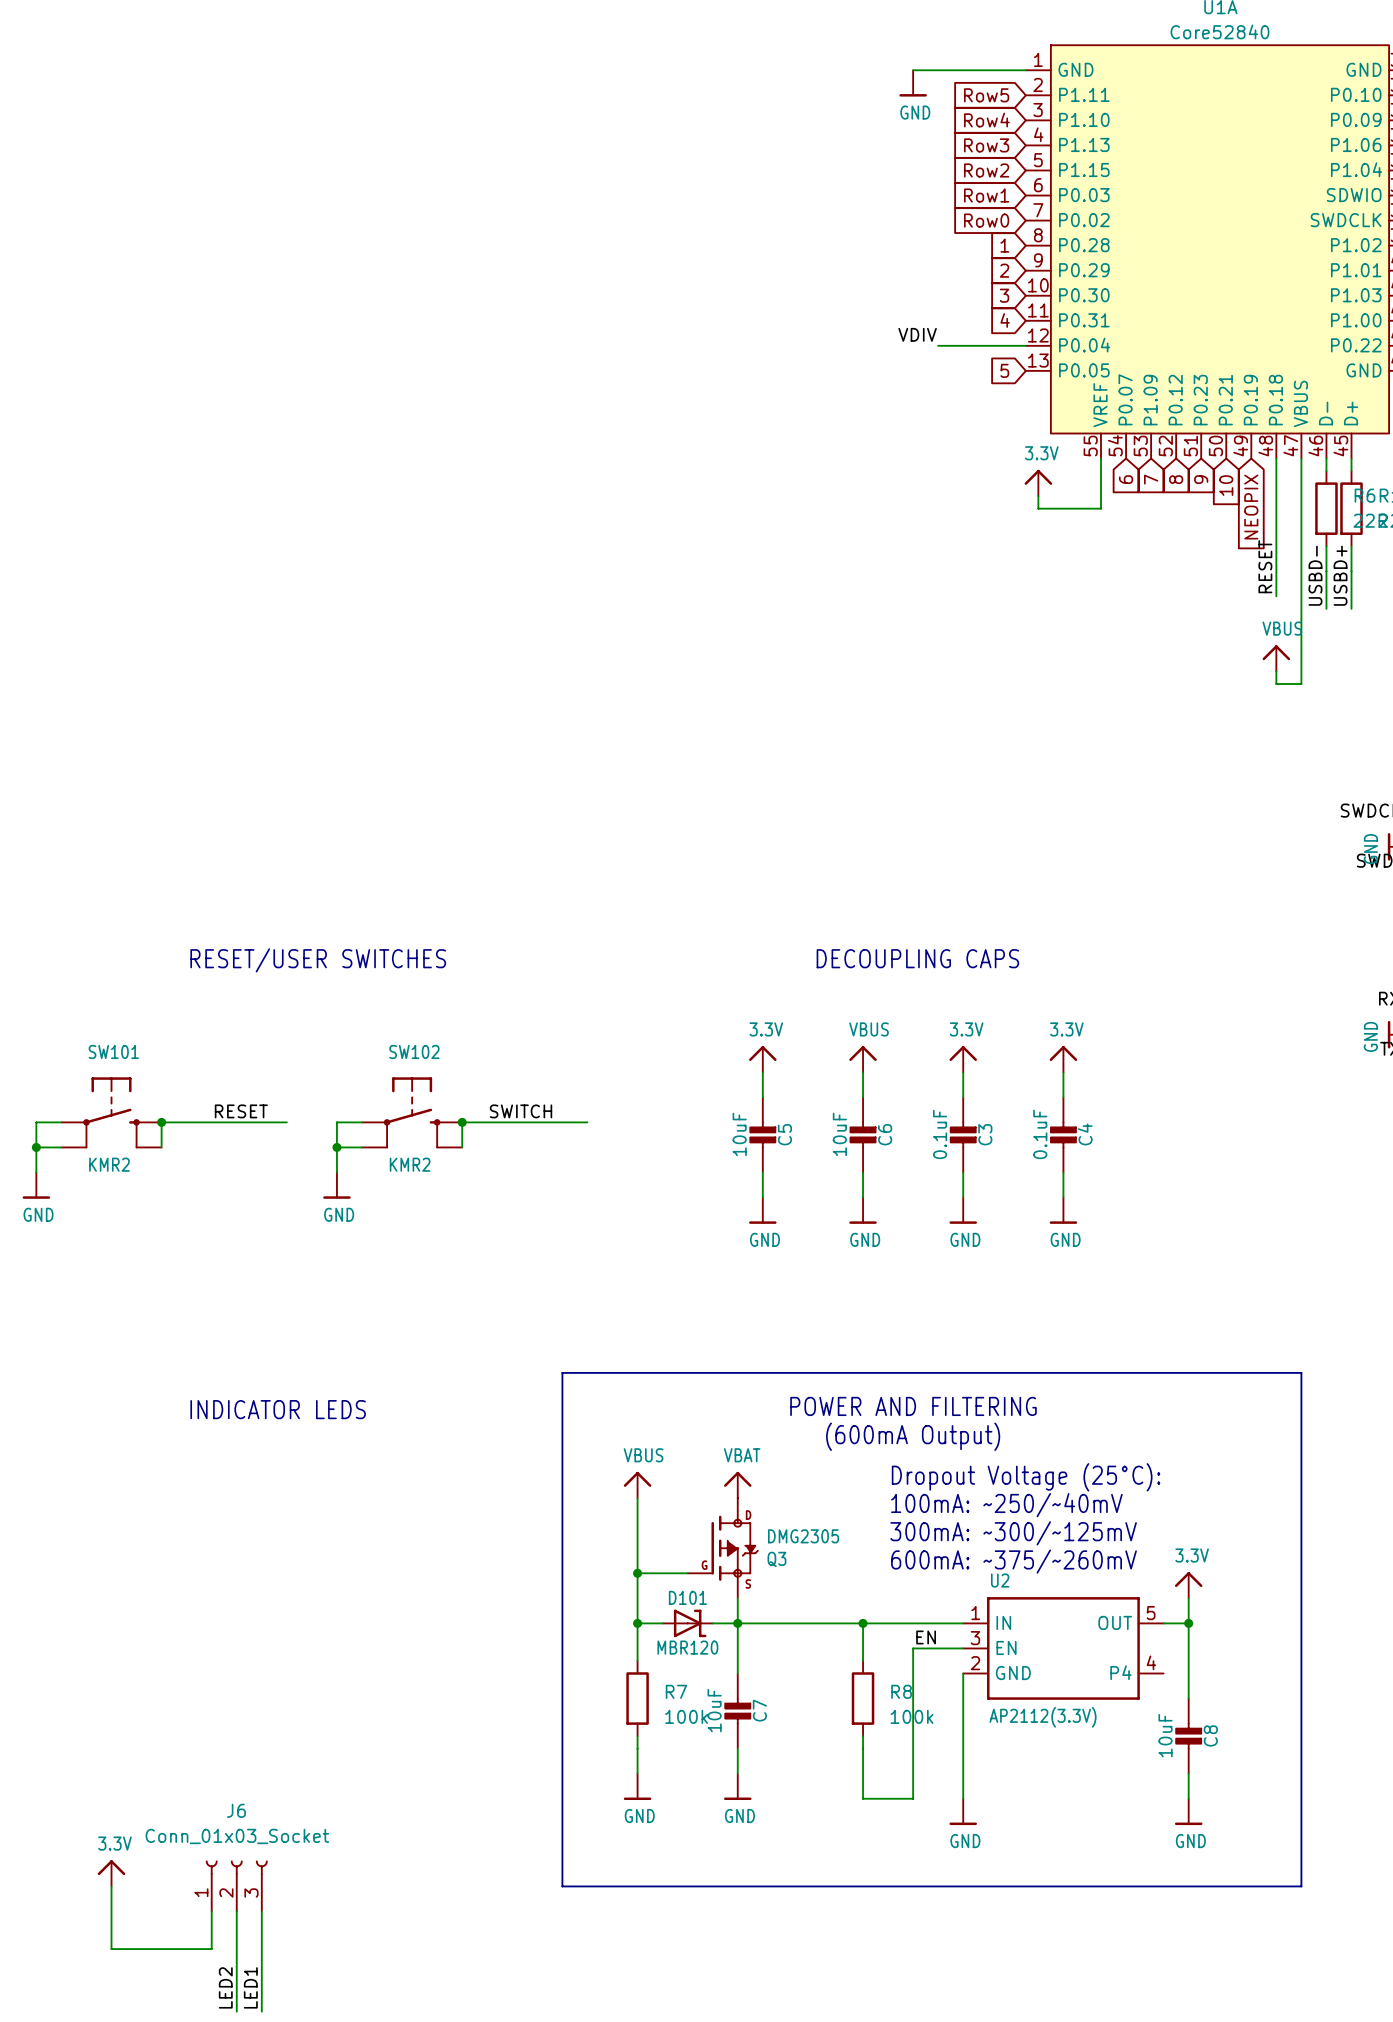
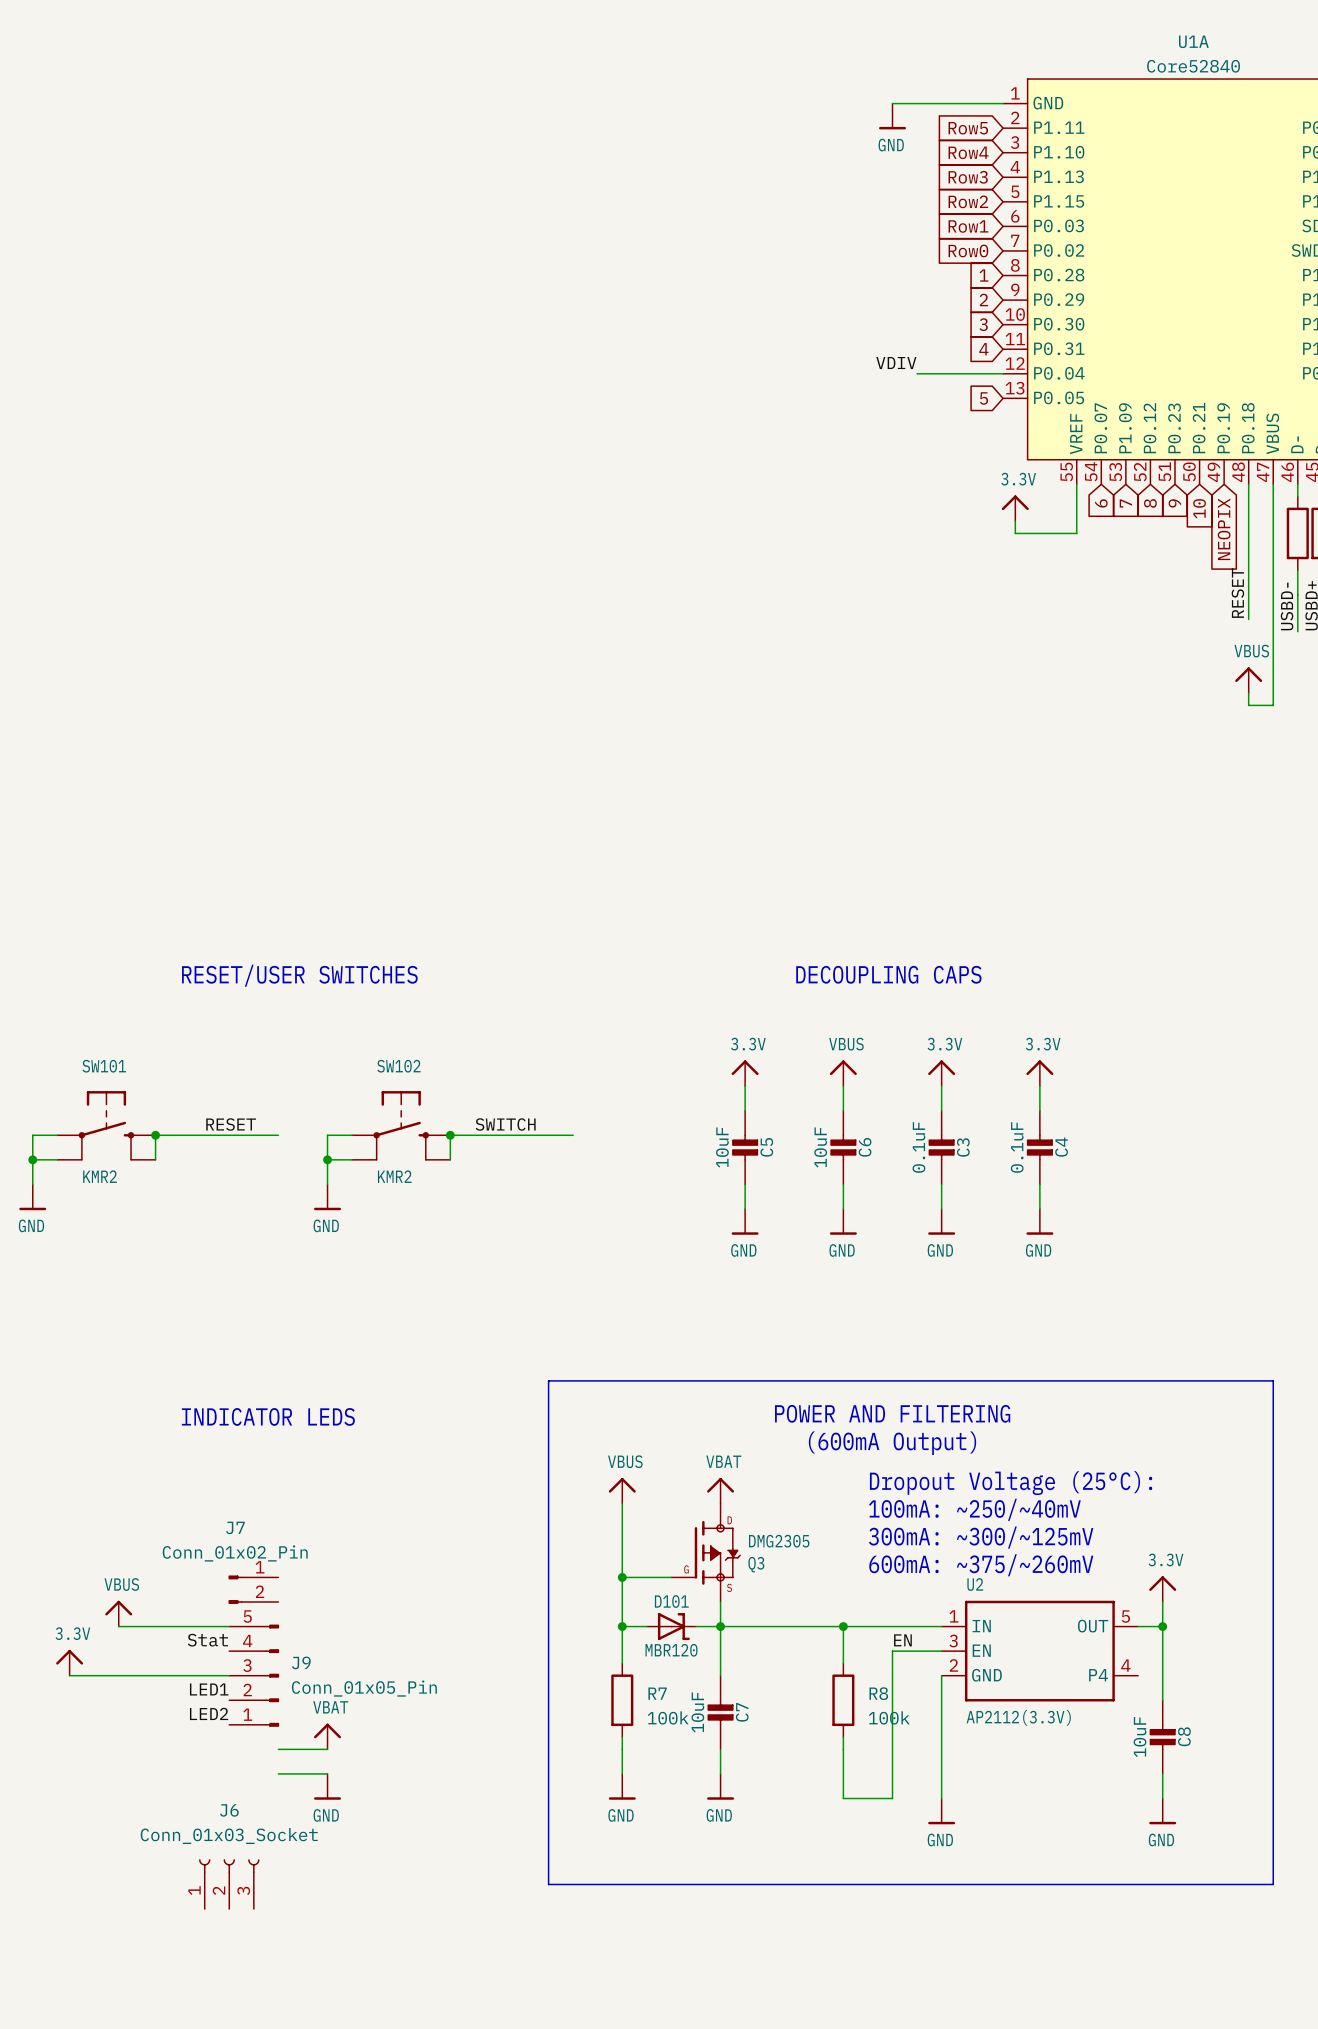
J7: none -> Conn_01x02_Pin (253, 1589)
power symbol: none -> VBUS (118, 1613)
wire: none -> (118, 1626) (229, 1626)
label: none -> Stat (207, 1640)
wire: none -> (69, 1675) (229, 1675)
J9: none -> Conn_01x05_Pin (254, 1675)
label: none -> LED1 (209, 1689)
label: none -> LED2 (209, 1713)
power symbol: none -> VBAT (327, 1736)
wire: none -> (278, 1749) (327, 1749)
wire: none -> (278, 1773) (327, 1773)
power symbol: none -> GND (327, 1786)
power symbol position: 3.3V (111, 1873) -> 3.3V (69, 1662)
wire: (111, 1886) (111, 1949) (211, 1949) (211, 1911) -> none
wire: (236, 1911) (236, 2011) -> none
wire: (261, 1911) (261, 2011) -> none
label: LED2 (225, 1987) -> none
label: LED1 (250, 1987) -> none

